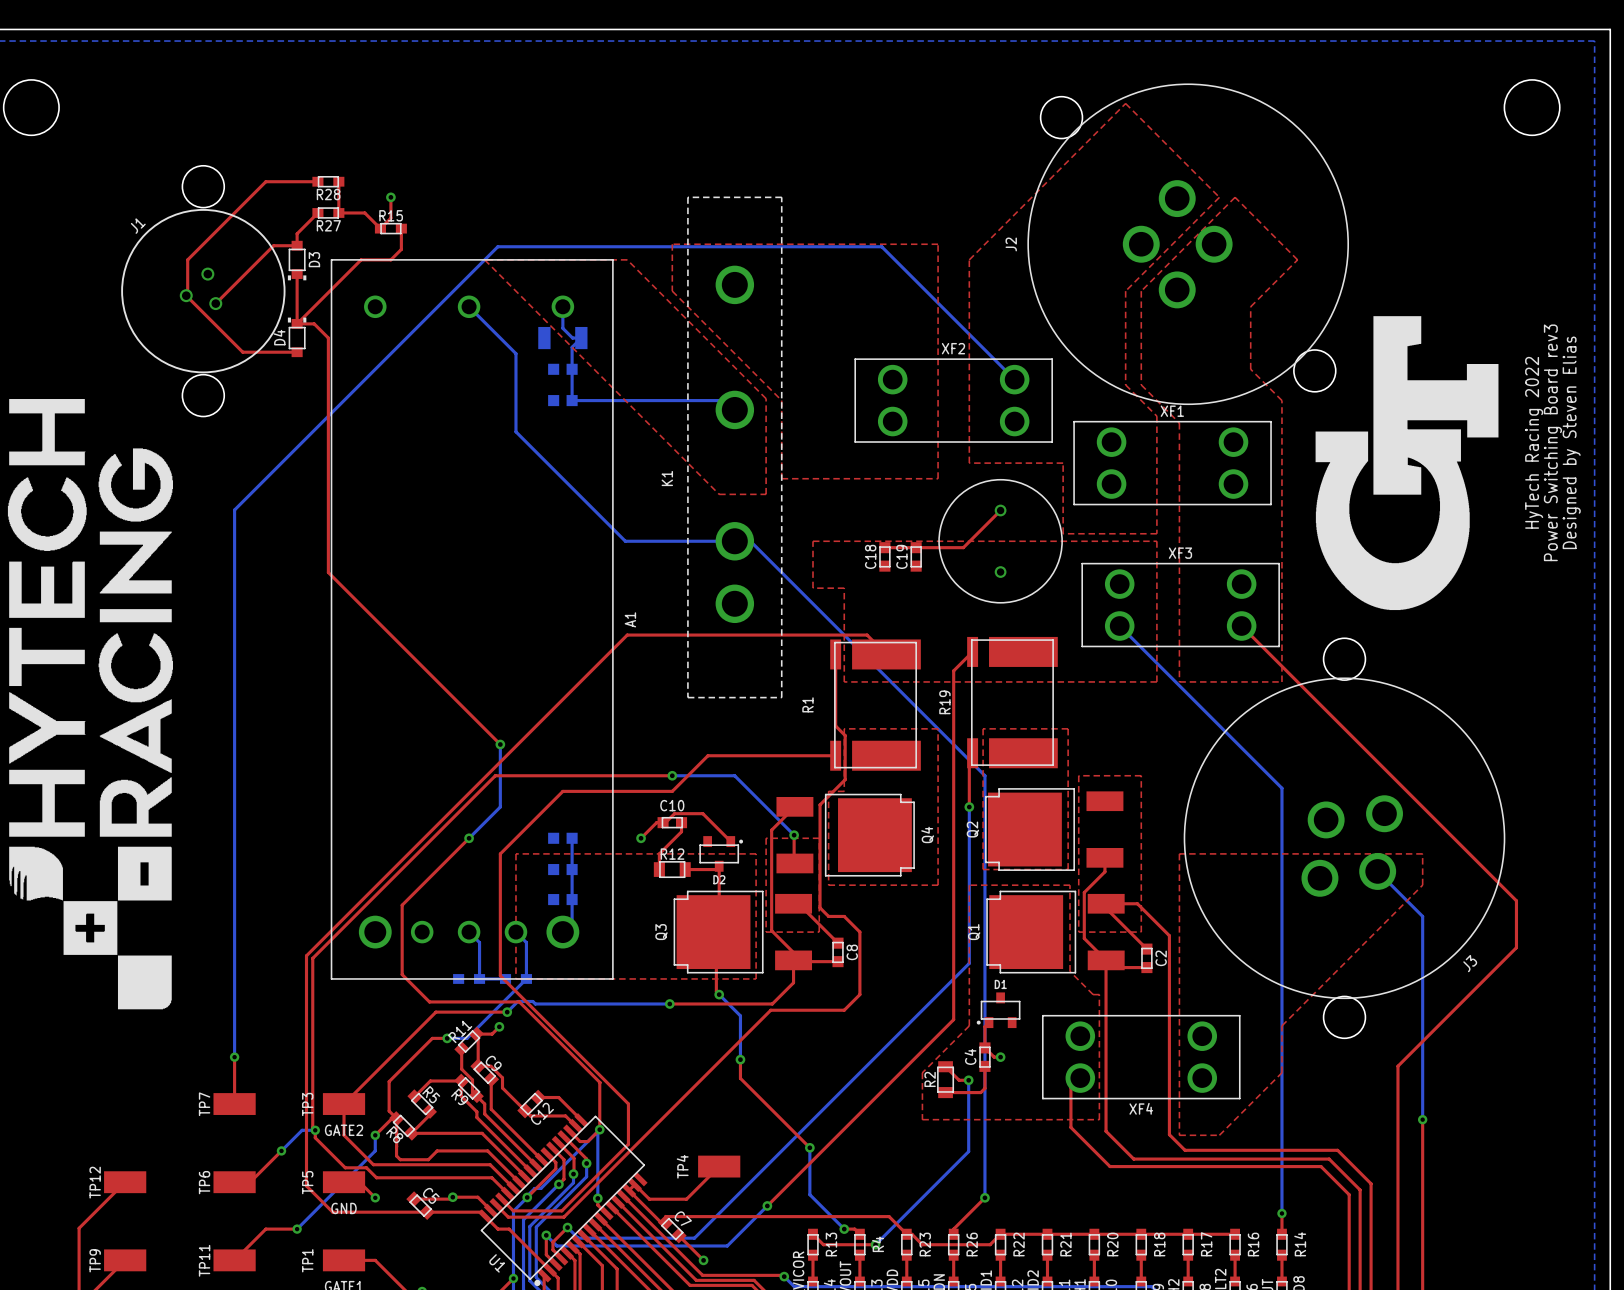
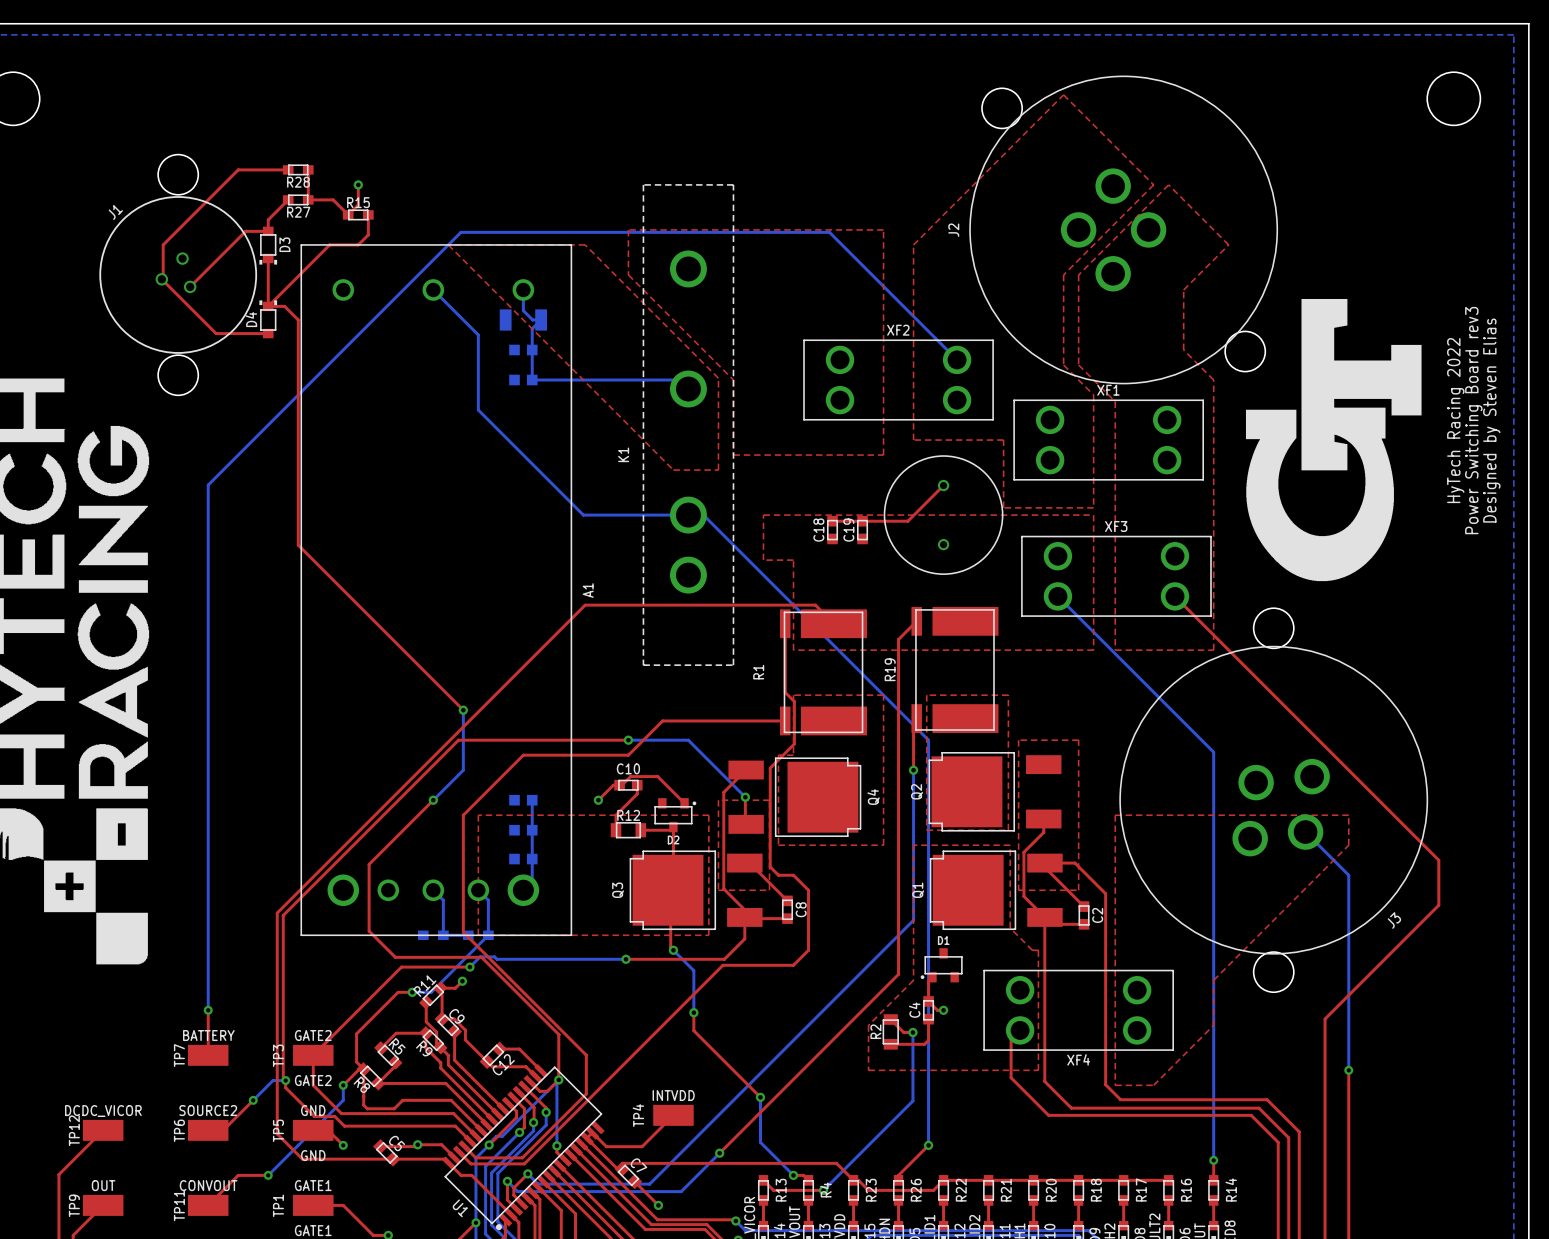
TP7 text: none -> BATTERY (208, 1035)
TP3 text: none -> GATE2 (313, 1035)
TP4 text: none -> INTVDD (673, 1095)
TP6 text: none -> SOURCE2 (208, 1110)
TP5 text: none -> GND (313, 1110)
TP12 text: none -> DCDC_VICOR (103, 1111)
TP9 text: none -> OUT (103, 1185)
TP11 text: none -> CONVOUT (208, 1185)
TP1 text: none -> GATE1 (313, 1185)

